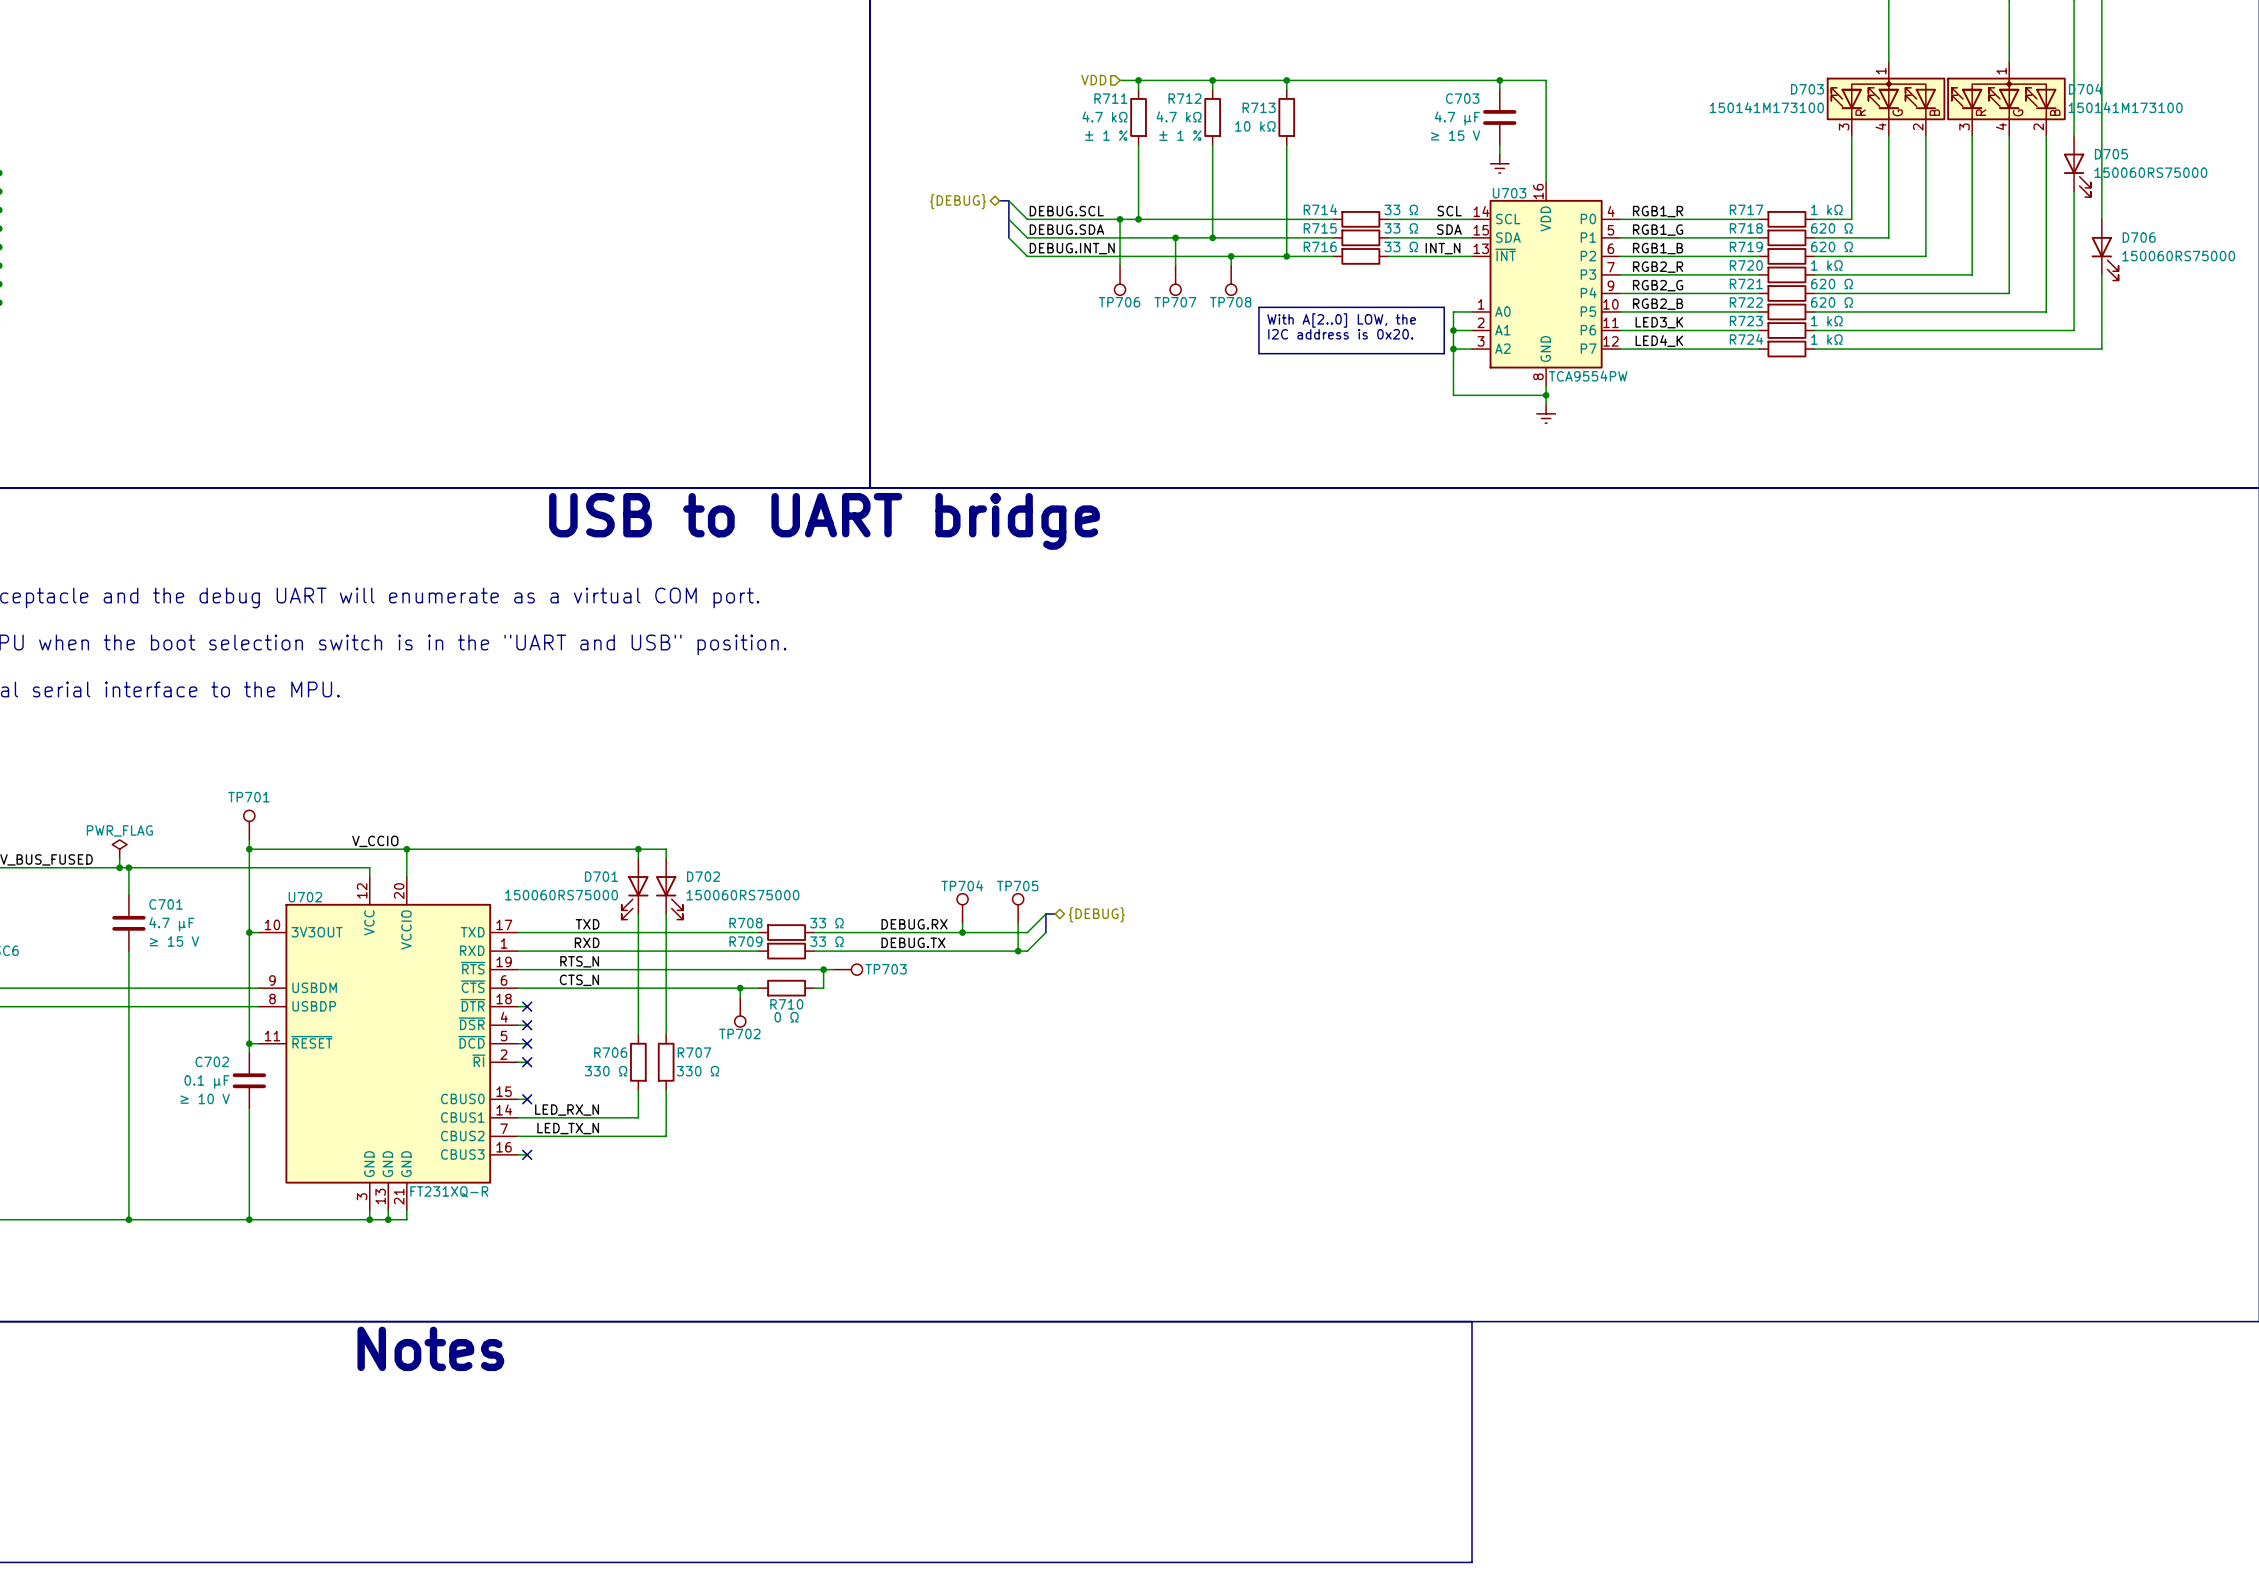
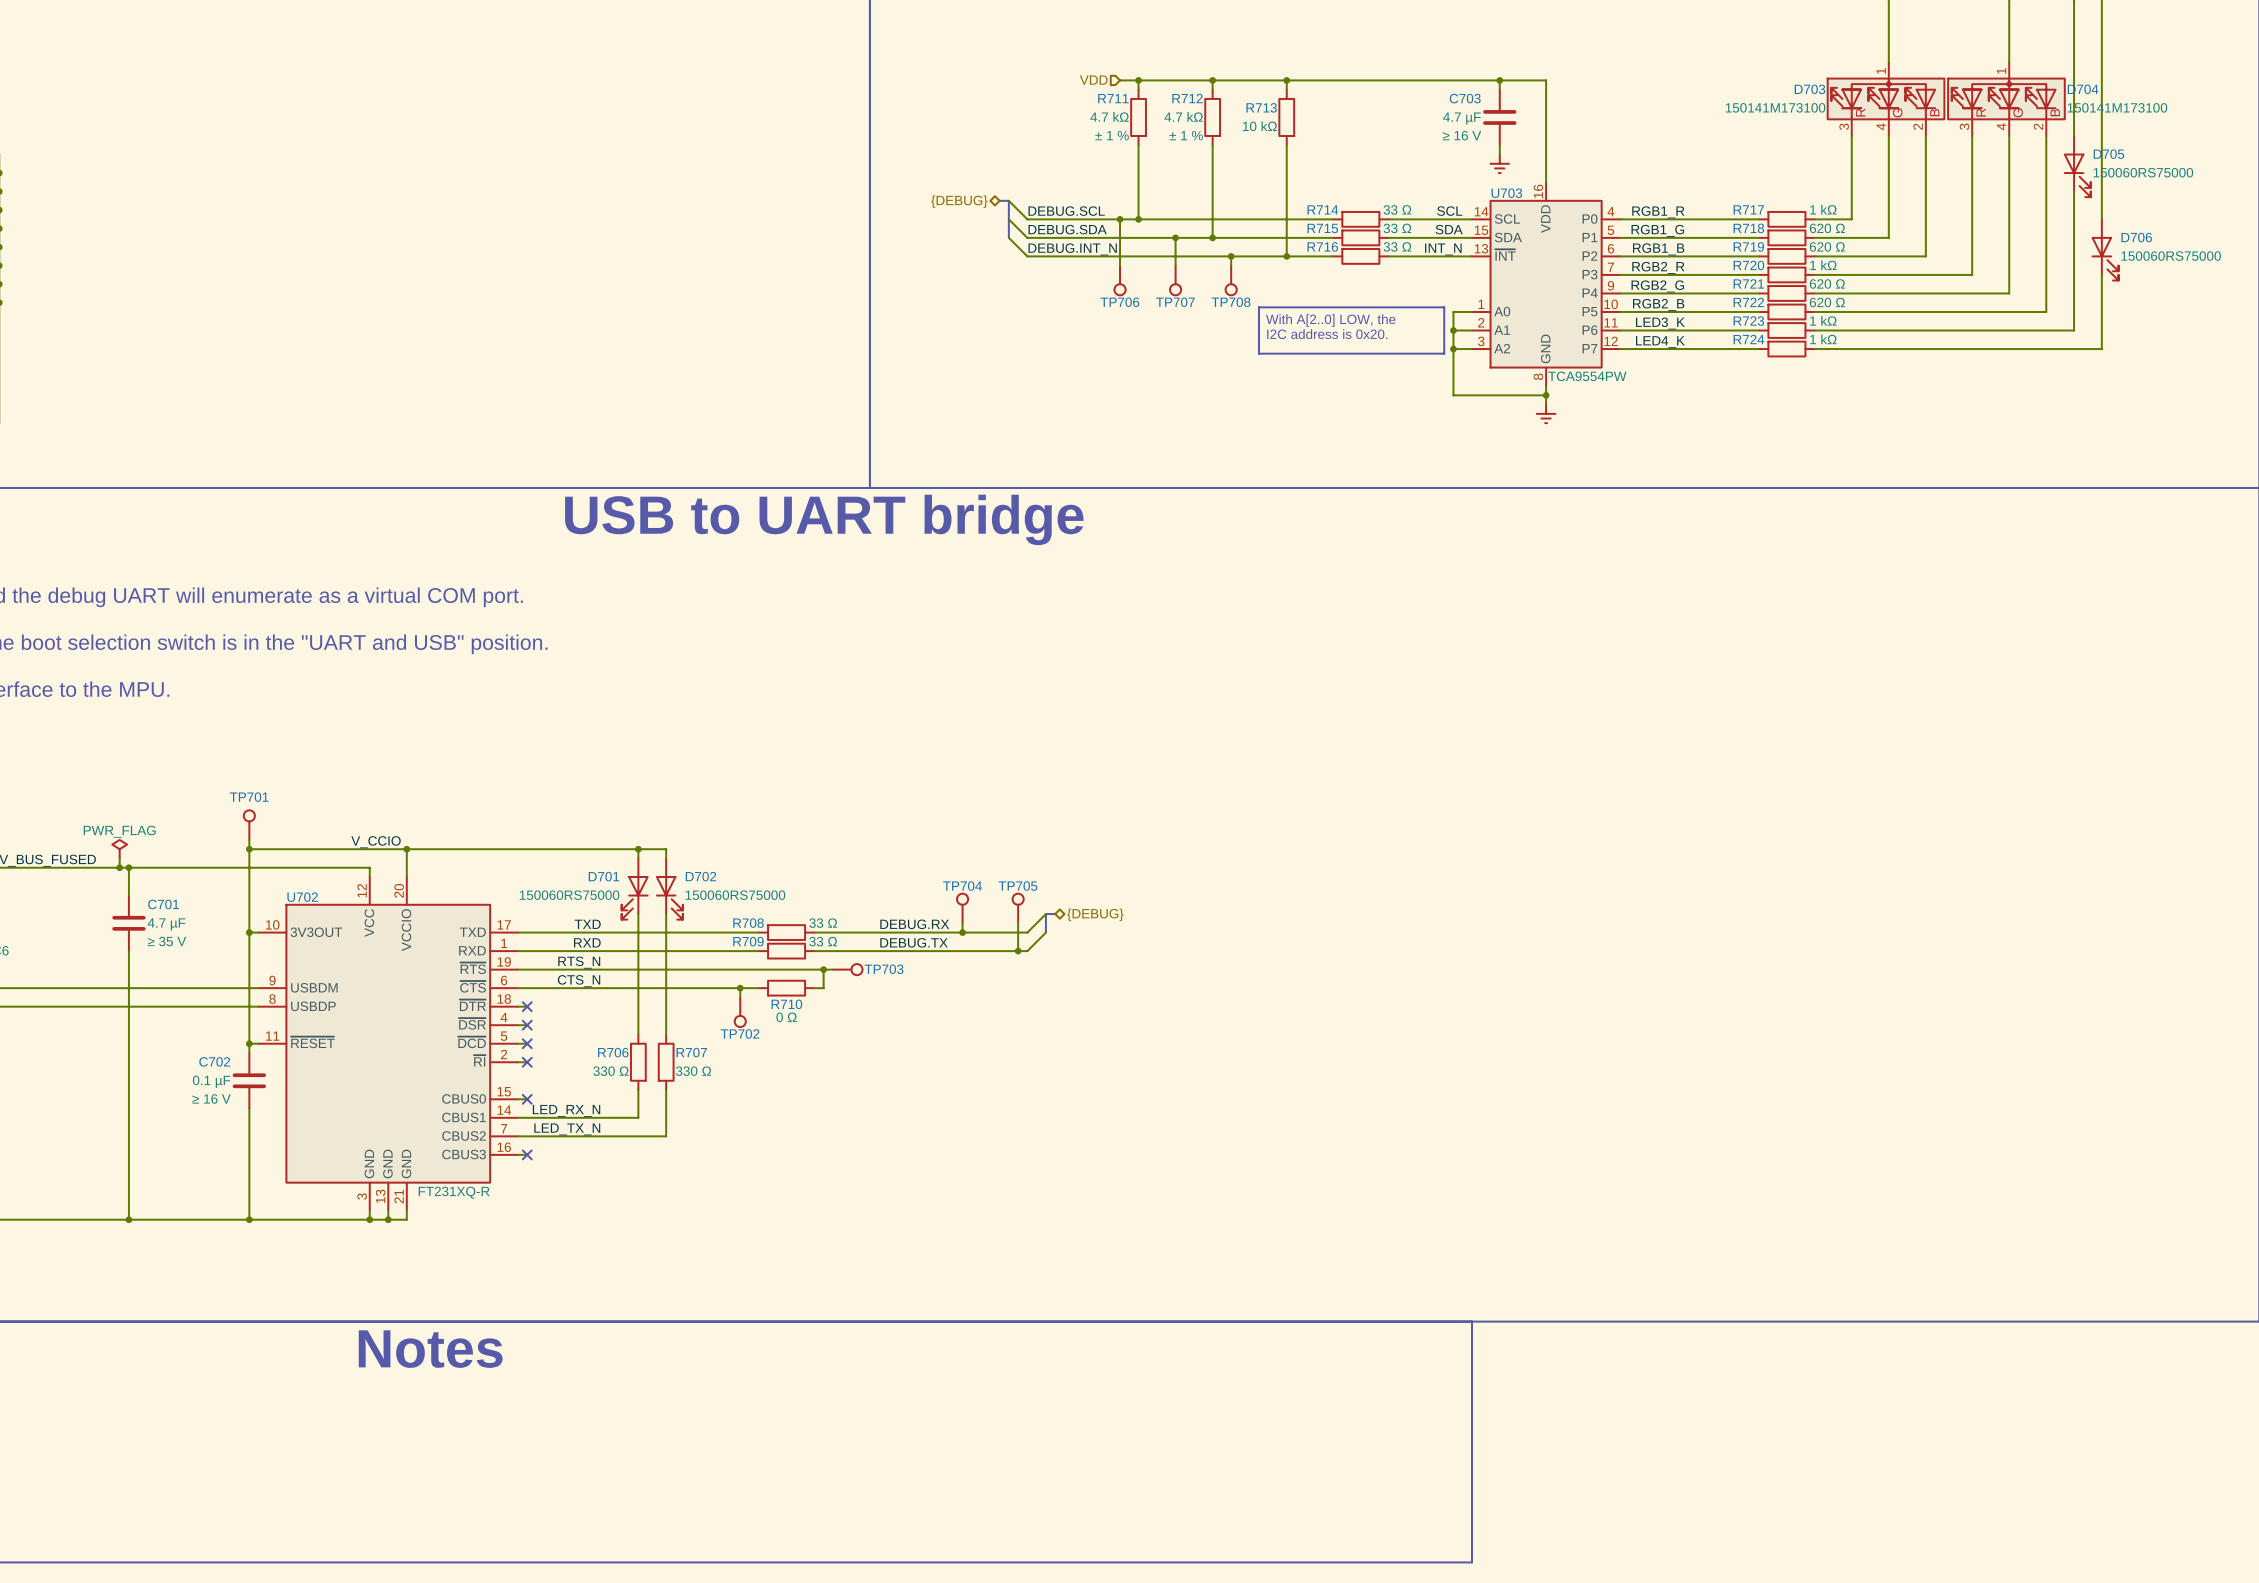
C703 text: ≥ 15 V (1455, 135) -> ≥ 16 V (1462, 135)
C701 text: ≥ 15 V (174, 941) -> ≥ 35 V (167, 941)
C702 text: ≥ 10 V (205, 1098) -> ≥ 16 V (211, 1098)

